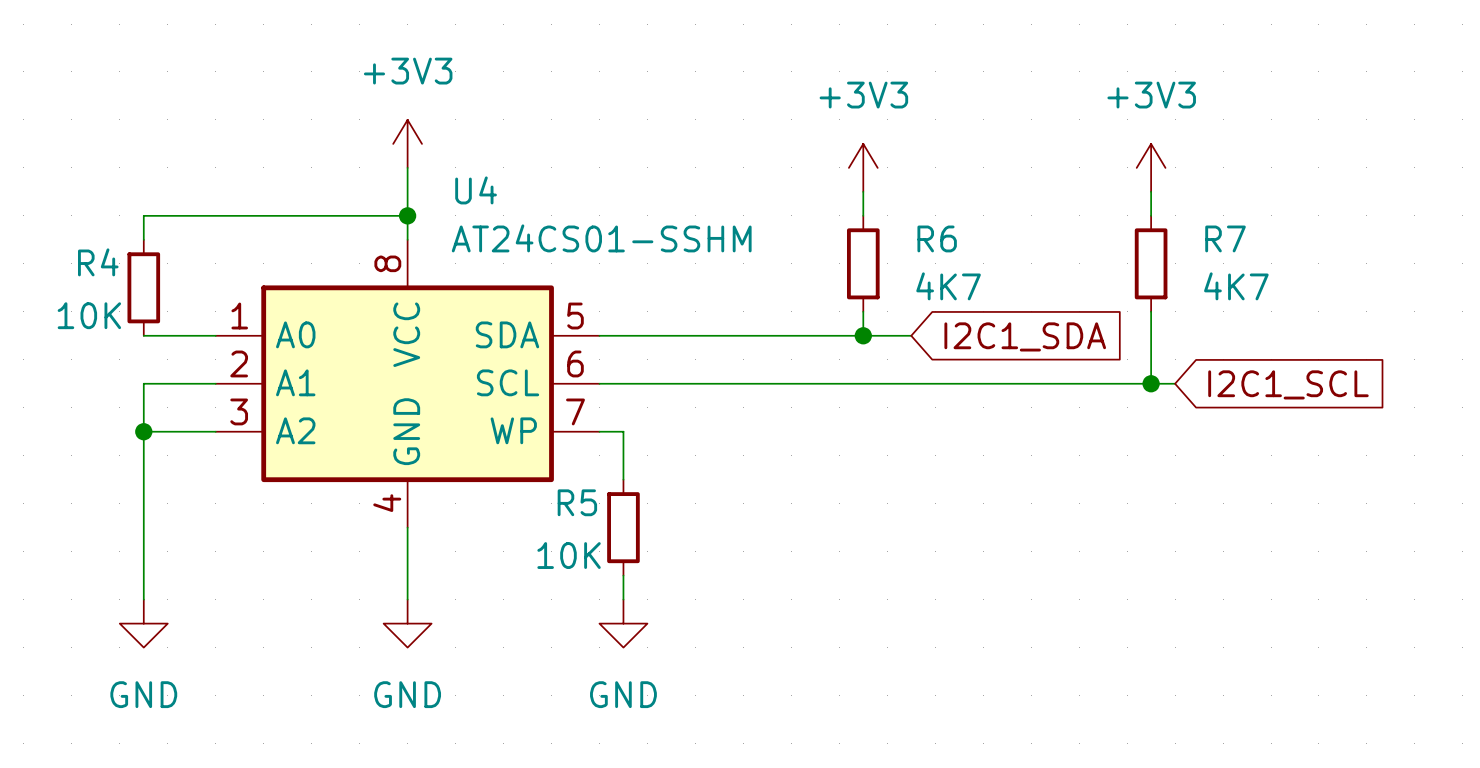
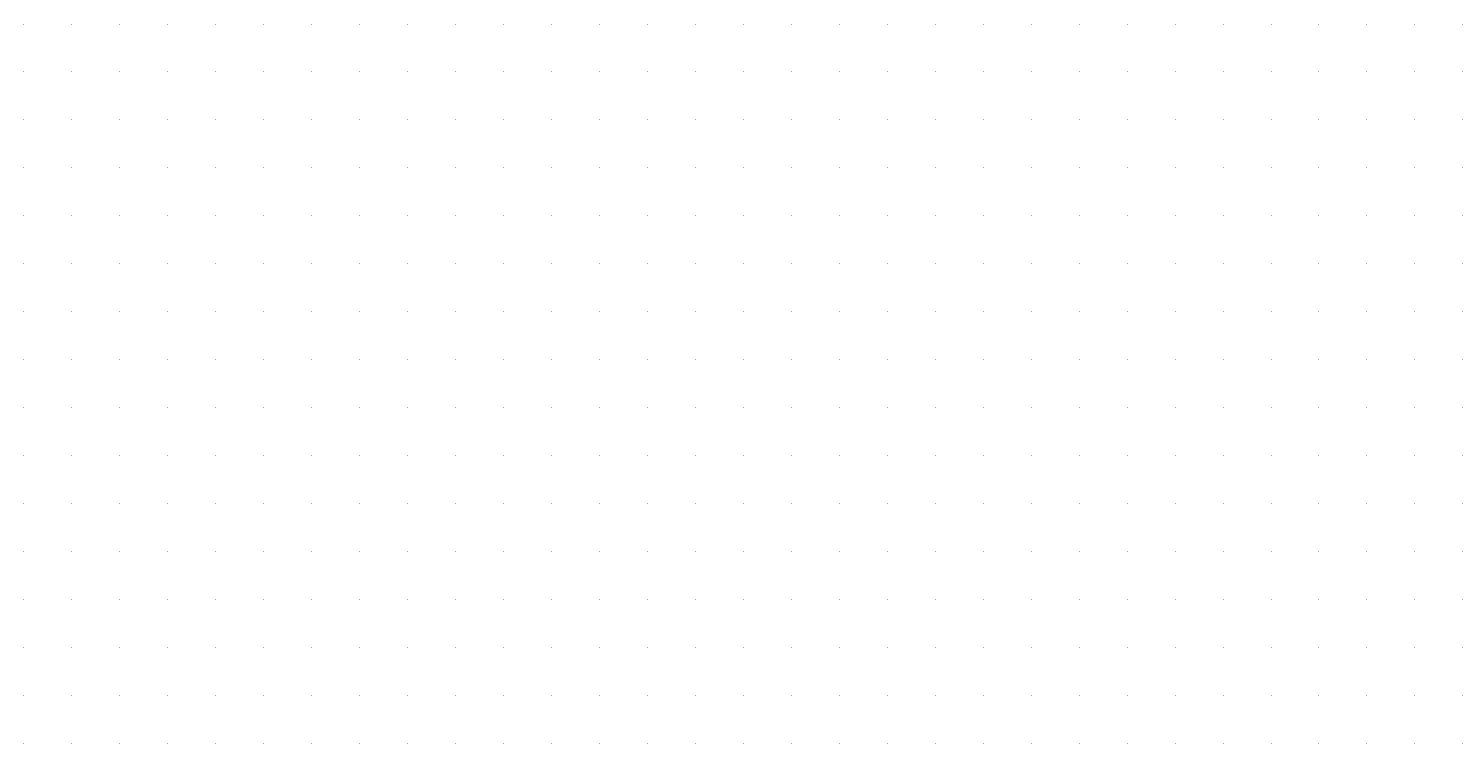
power symbol: +3V3 (407, 143) -> none
wire: (407, 167) (407, 239) -> none
power symbol: +3V3 (863, 167) -> none
power symbol: +3V3 (1151, 167) -> none
wire: (863, 191) (863, 215) -> none
wire: (1151, 191) (1151, 215) -> none
wire: (407, 215) (143, 215) (143, 239) -> none
junction: (407, 215) -> none
R6: 4K7 (863, 263) -> none
R7: 4K7 (1151, 263) -> none
R4: 10K (143, 287) -> none
wire: (863, 311) (863, 335) -> none
wire: (1151, 311) (1151, 383) -> none
wire: (143, 335) (215, 335) -> none
wire: (599, 335) (911, 335) -> none
junction: (863, 335) -> none
global label: I2C1_SDA (1025, 336) -> none
wire: (215, 383) (143, 383) (143, 599) -> none
U4: AT24CS01-SSHM (407, 383) -> none
wire: (599, 383) (1175, 383) -> none
junction: (1151, 383) -> none
global label: I2C1_SCL (1288, 384) -> none
wire: (143, 431) (215, 431) -> none
junction: (143, 431) -> none
wire: (599, 431) (623, 431) (623, 479) -> none
wire: (407, 527) (407, 599) -> none
R5: 10K (623, 527) -> none
wire: (623, 575) (623, 599) -> none
power symbol: GND (143, 623) -> none
power symbol: GND (407, 623) -> none
power symbol: GND (623, 623) -> none

